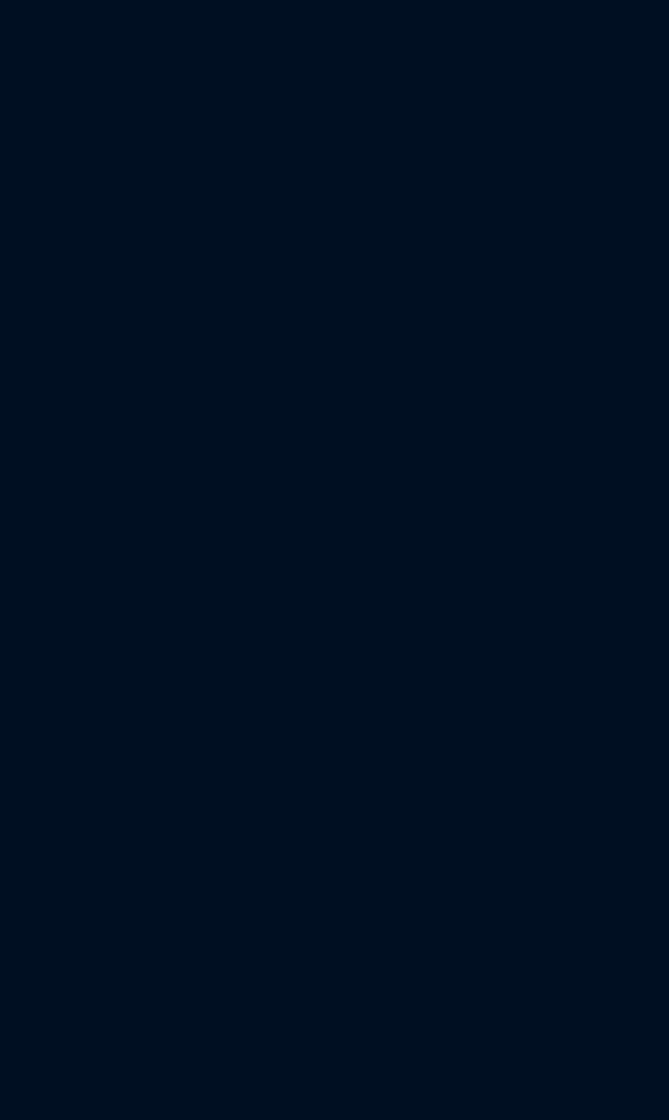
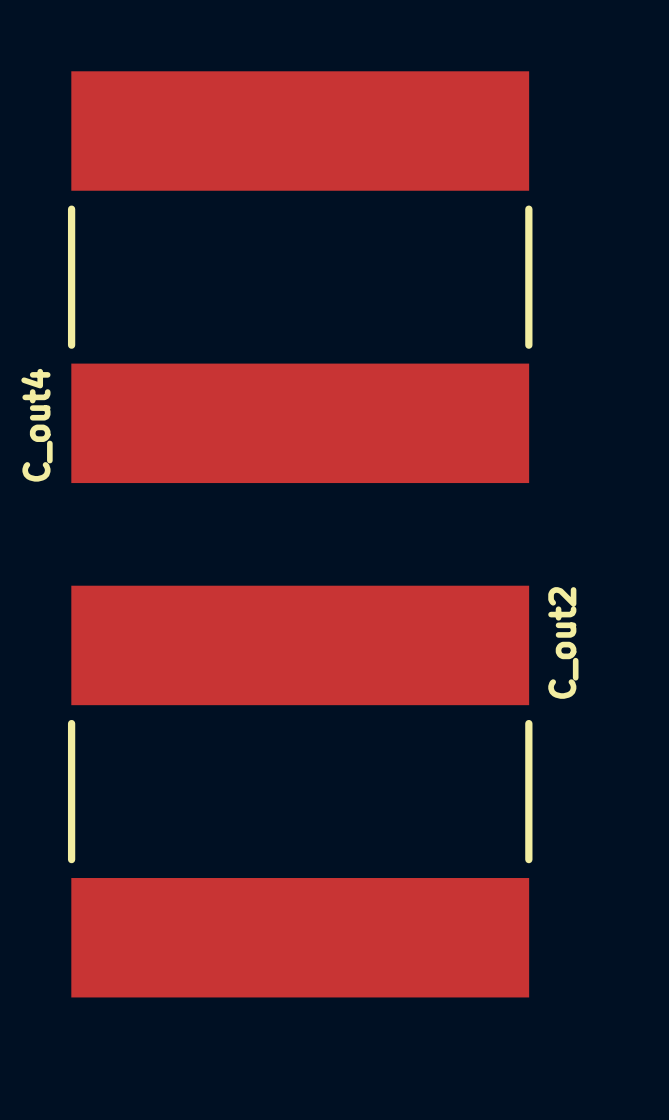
C_out4: none -> (300, 277)
C_out2: none -> (300, 791)

